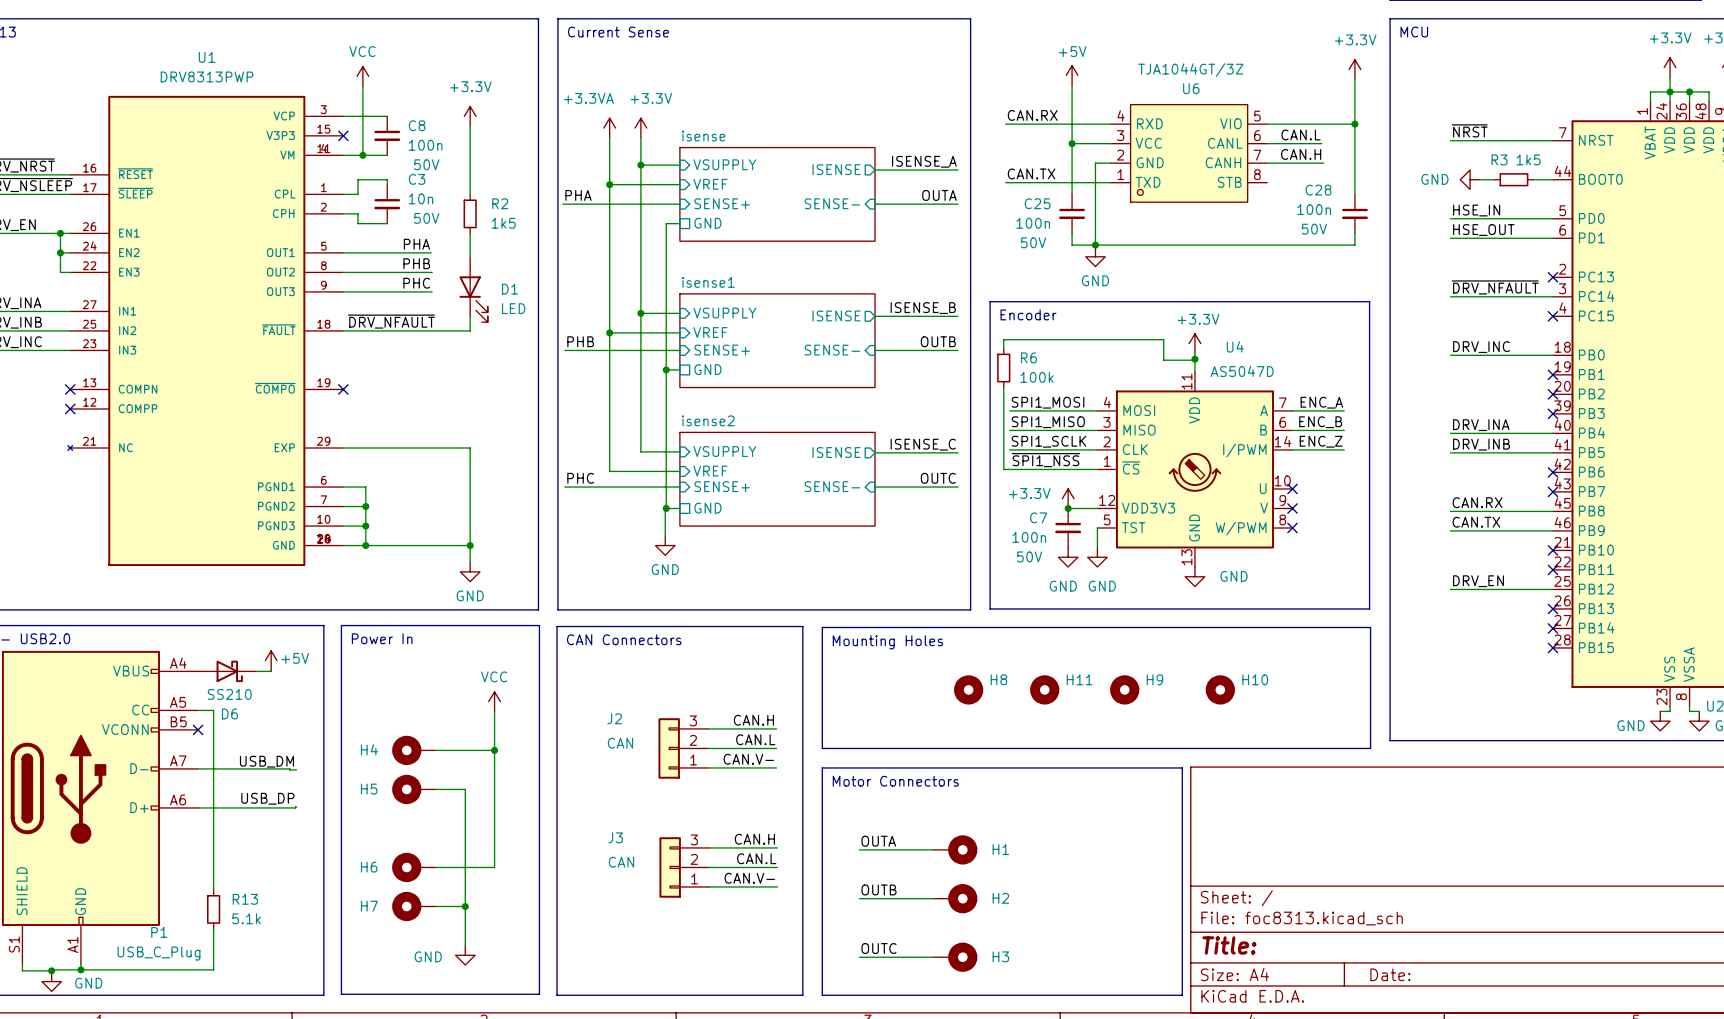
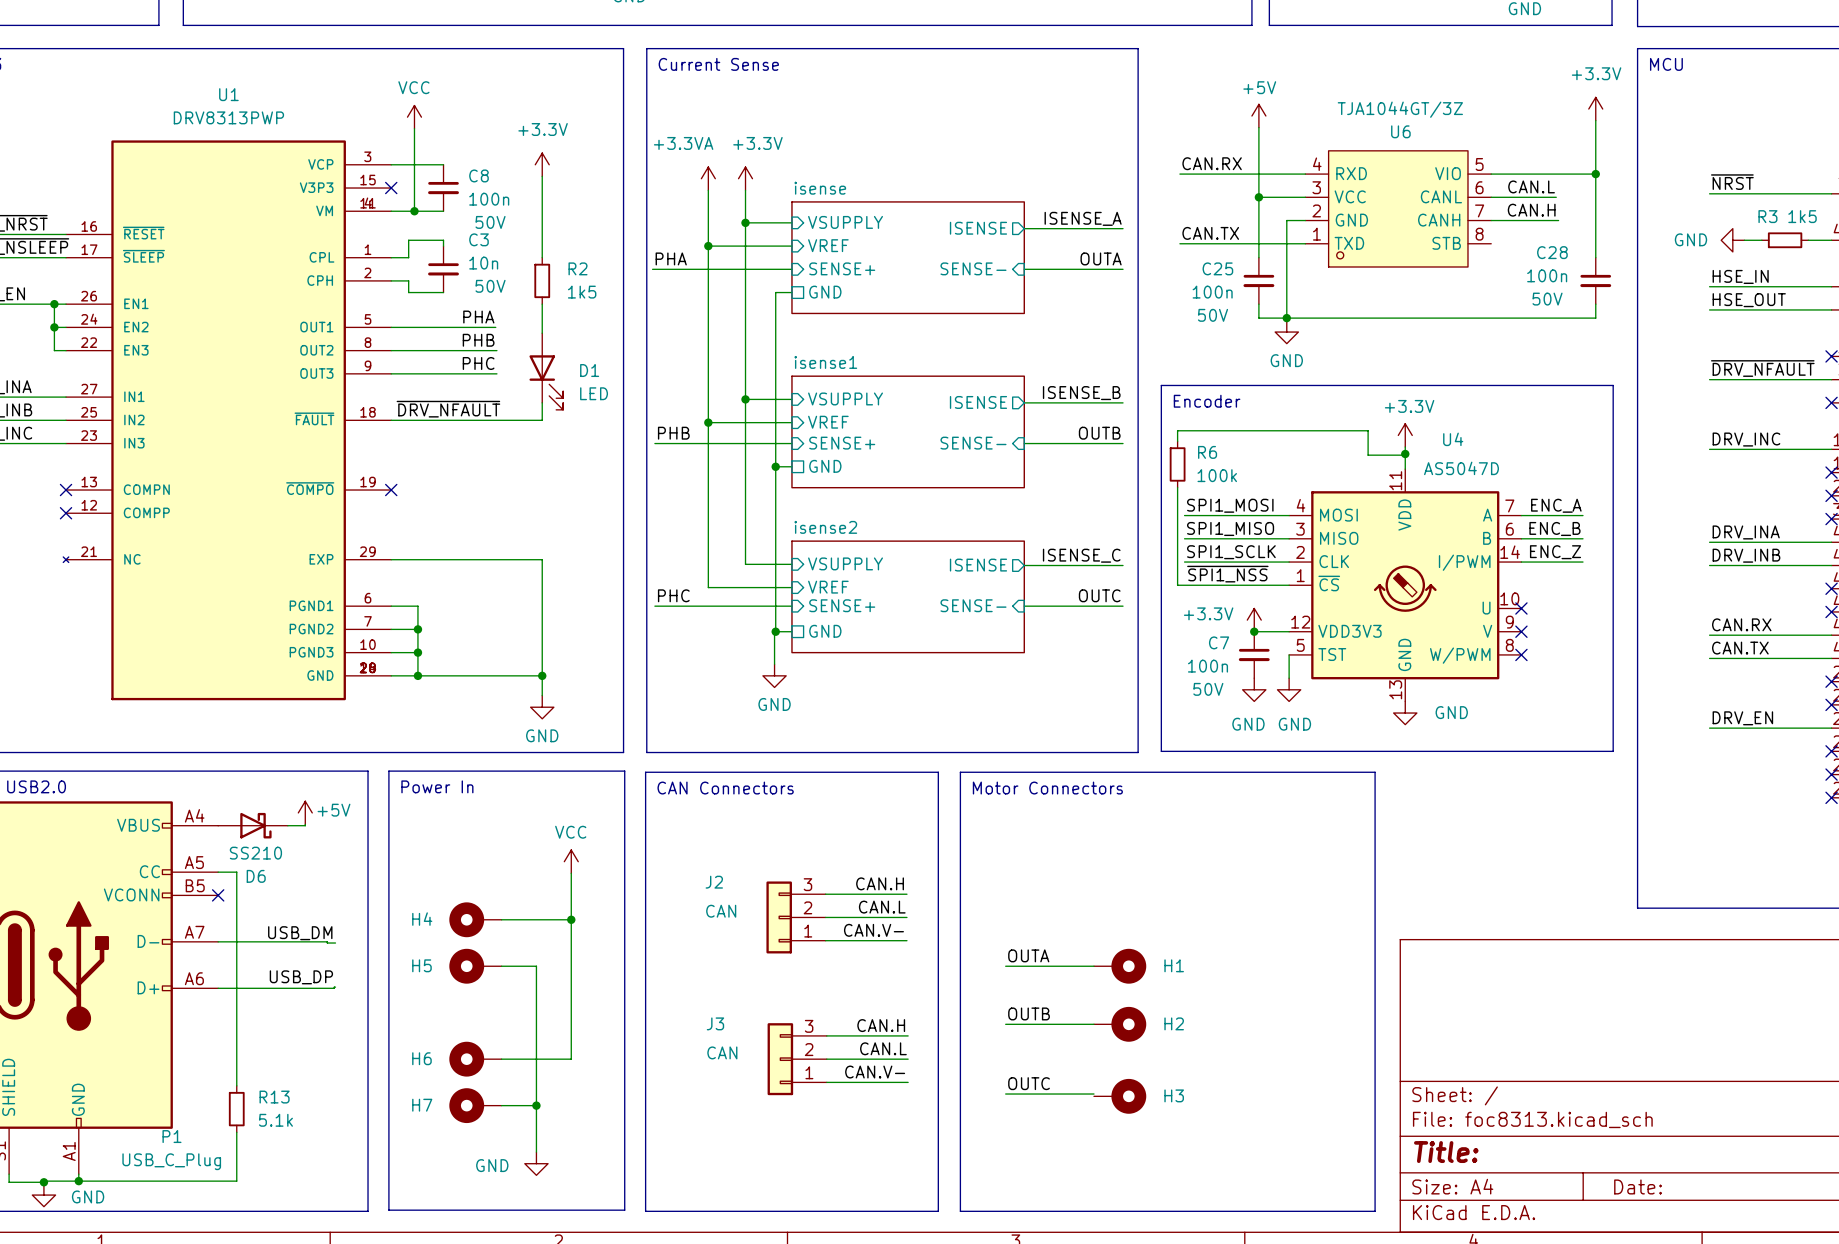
line: (822, 627) (822, 748) (1370, 748) (1370, 627) (822, 627) -> none
text: Mounting Holes (887, 642) -> none
H8: (968, 689) -> none
H11: (1044, 689) -> none
H9: (1124, 689) -> none
H10: (1220, 689) -> none
text position: Motor Connectors (895, 781) -> Motor Connectors (1047, 788)
H2: none -> (1120, 1024)
label position: OUTA (878, 841) -> OUTA (1028, 955)
wire: (859, 849) (933, 849) -> (1005, 966) (1093, 966)
H1 position: (955, 849) -> (1120, 966)
label position: OUTB (878, 889) -> OUTB (1029, 1013)
wire: (859, 898) (933, 898) -> (1005, 1024) (1093, 1024)
H2 name: H2 (1000, 898) -> H3 (1174, 1095)
label position: OUTC (878, 948) -> OUTC (1029, 1083)
wire: (859, 957) (933, 957) -> (1005, 1094) (1093, 1094)
H3: (955, 957) -> none
line: (822, 995) (822, 767) (1182, 767) (1182, 995) (1169, 995) -> (961, 1211) (960, 772) (1375, 772) (1375, 1211)

